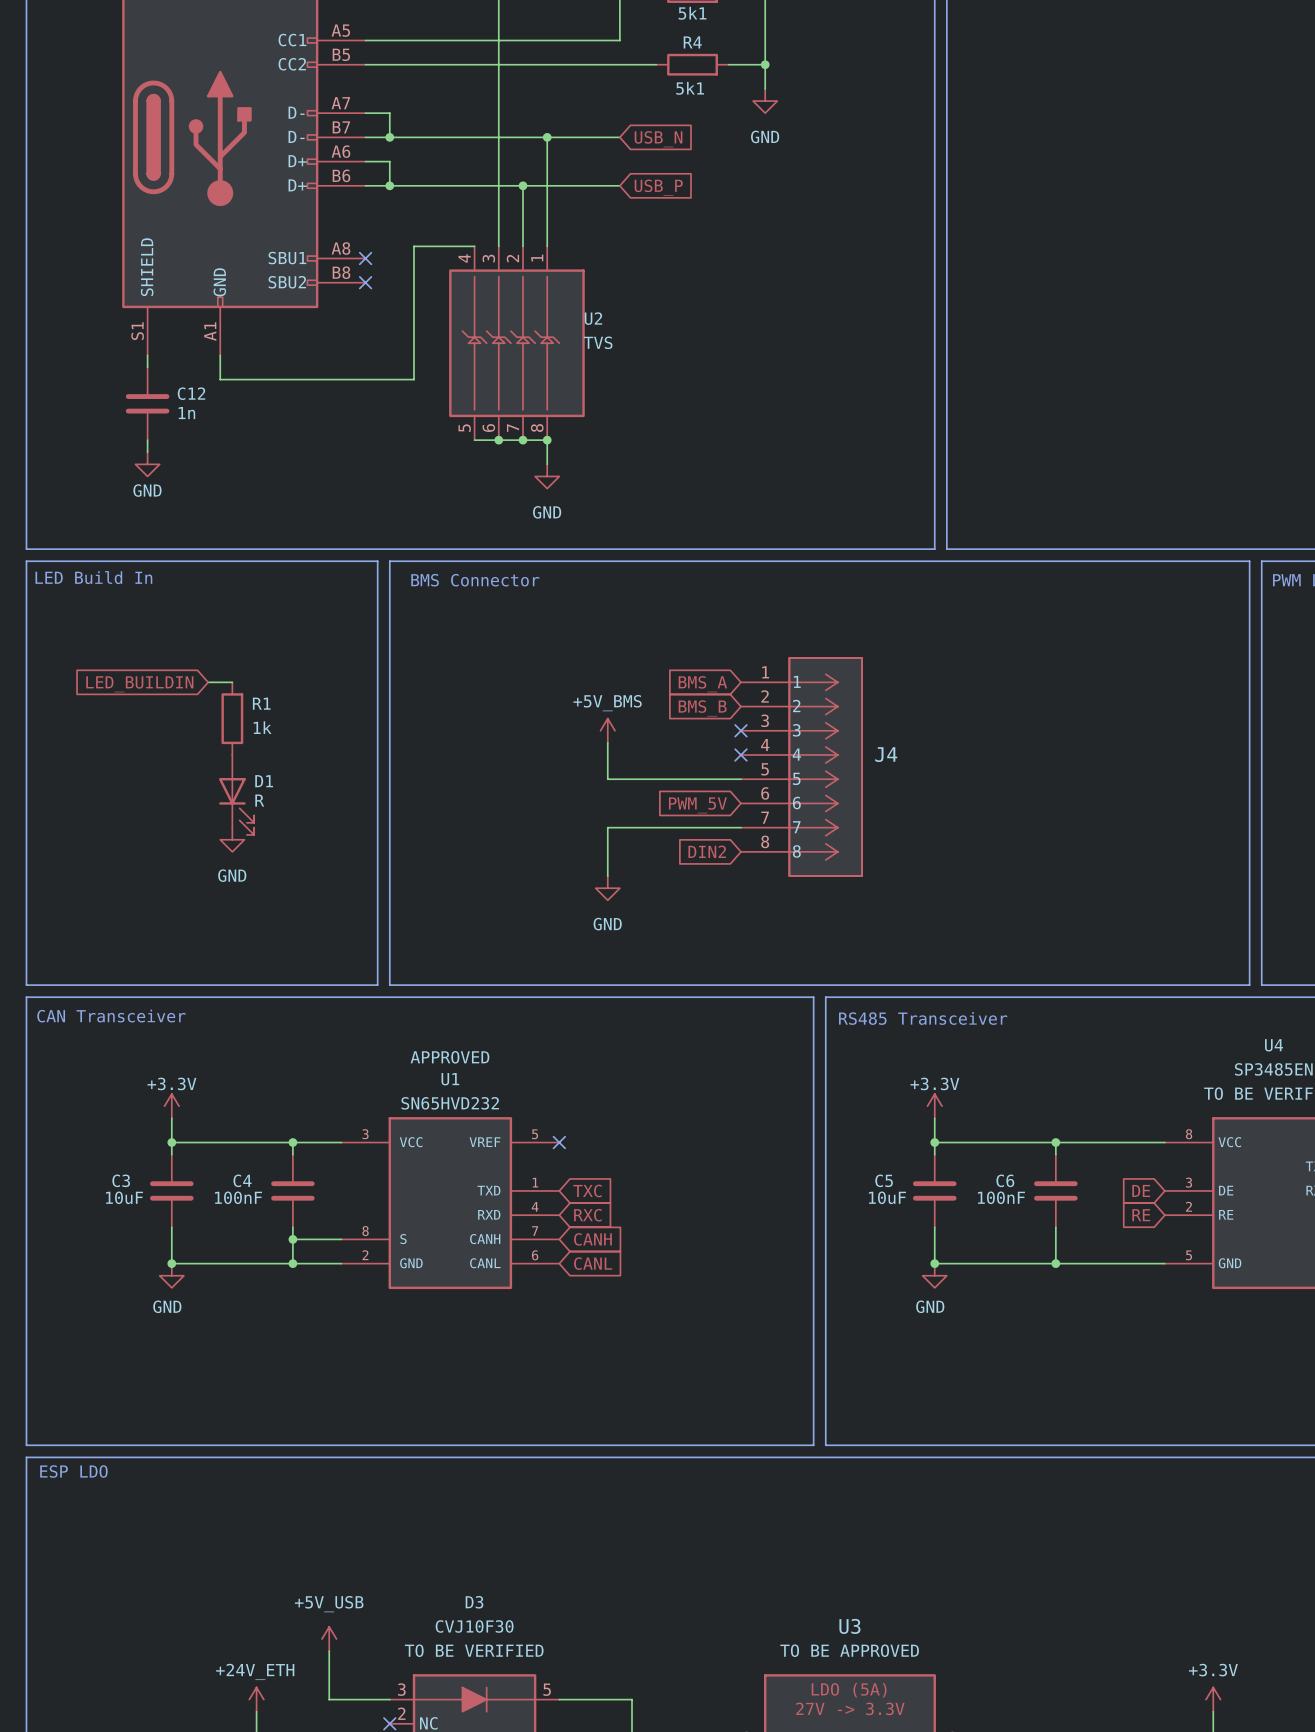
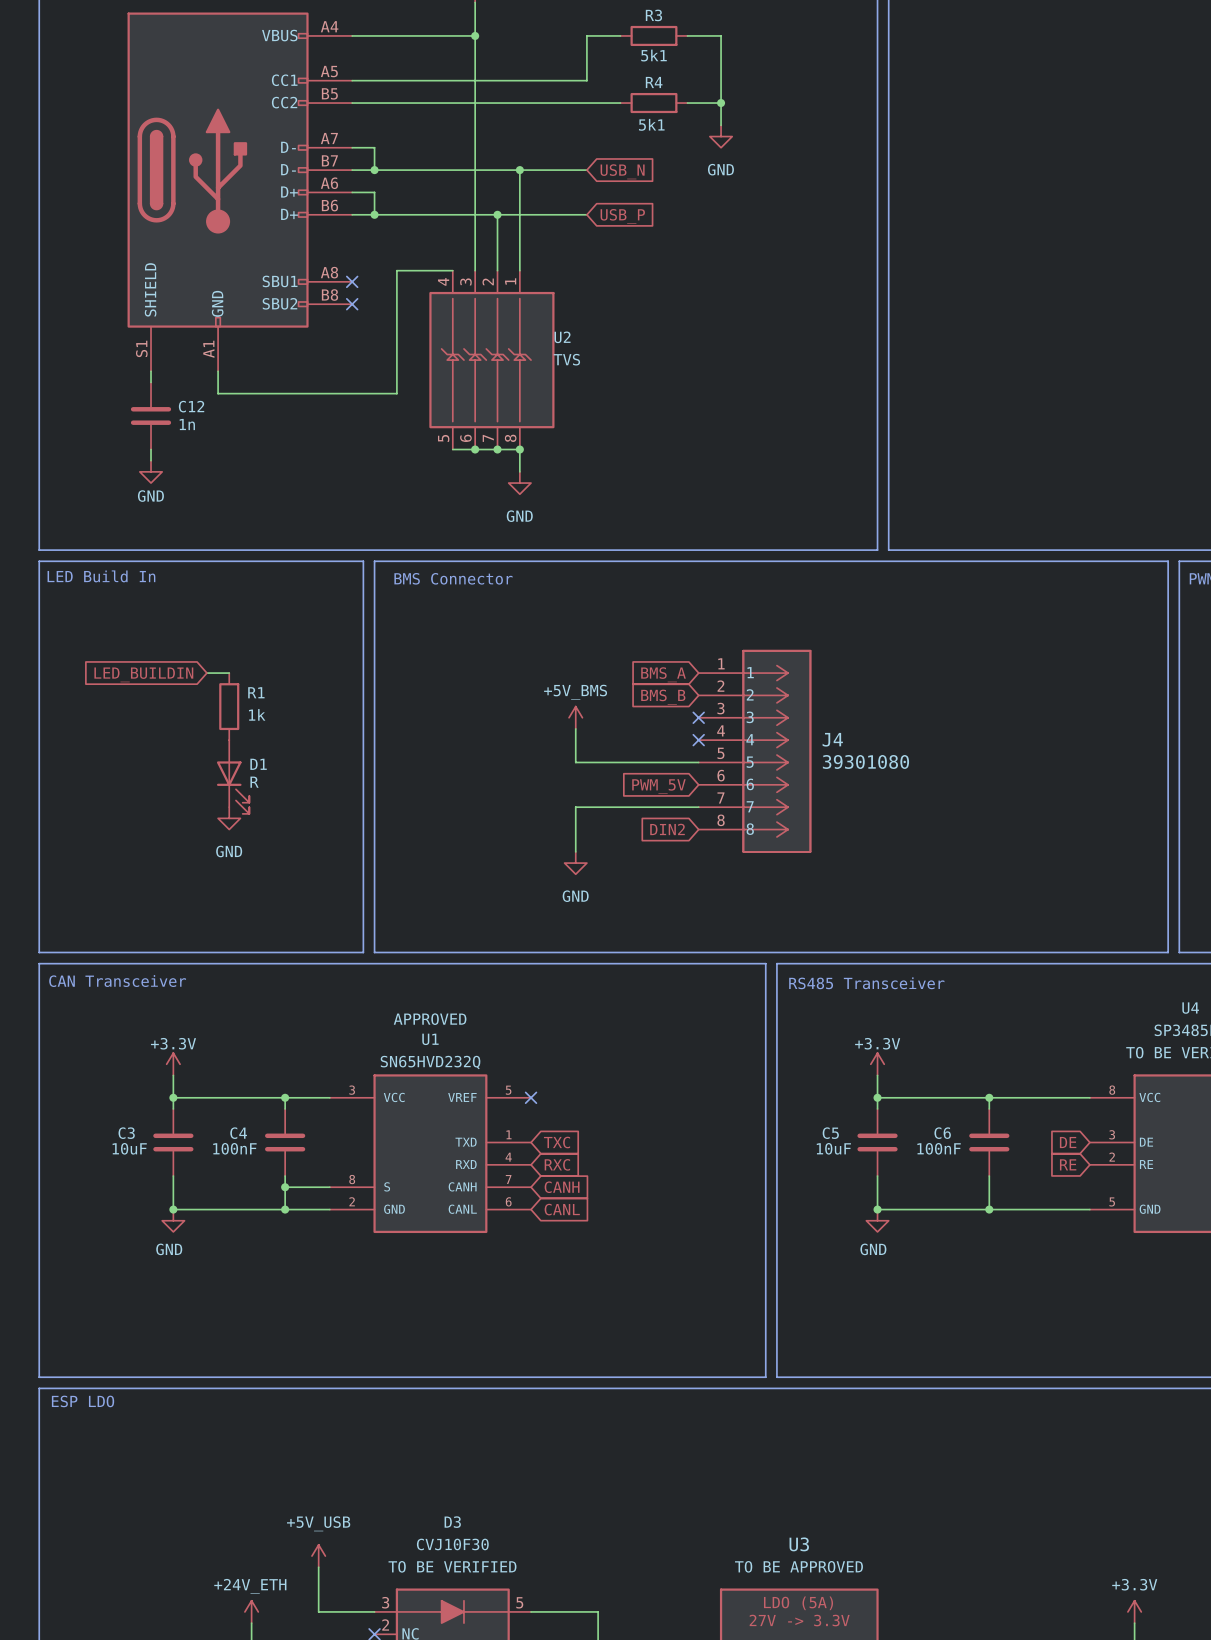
J4 value: none -> 39301080 (865, 761)
U1 value: SN65HVD232 (450, 1103) -> SN65HVD232Q (430, 1062)

